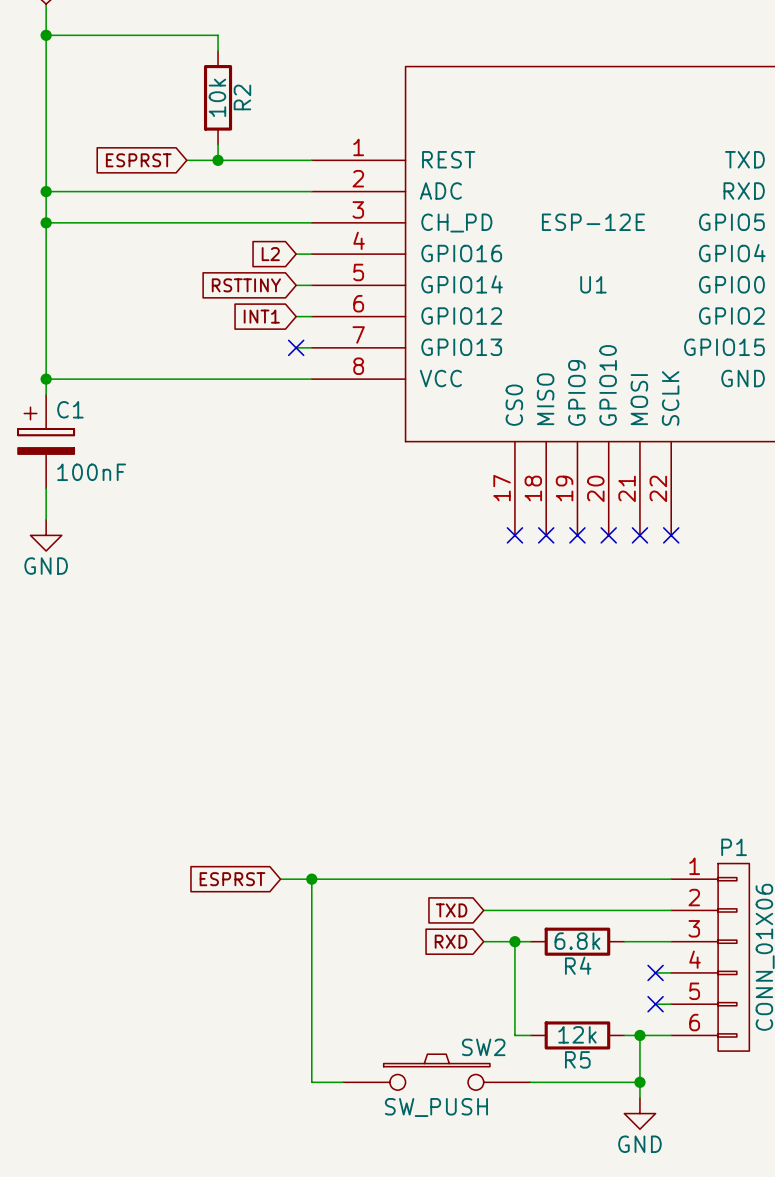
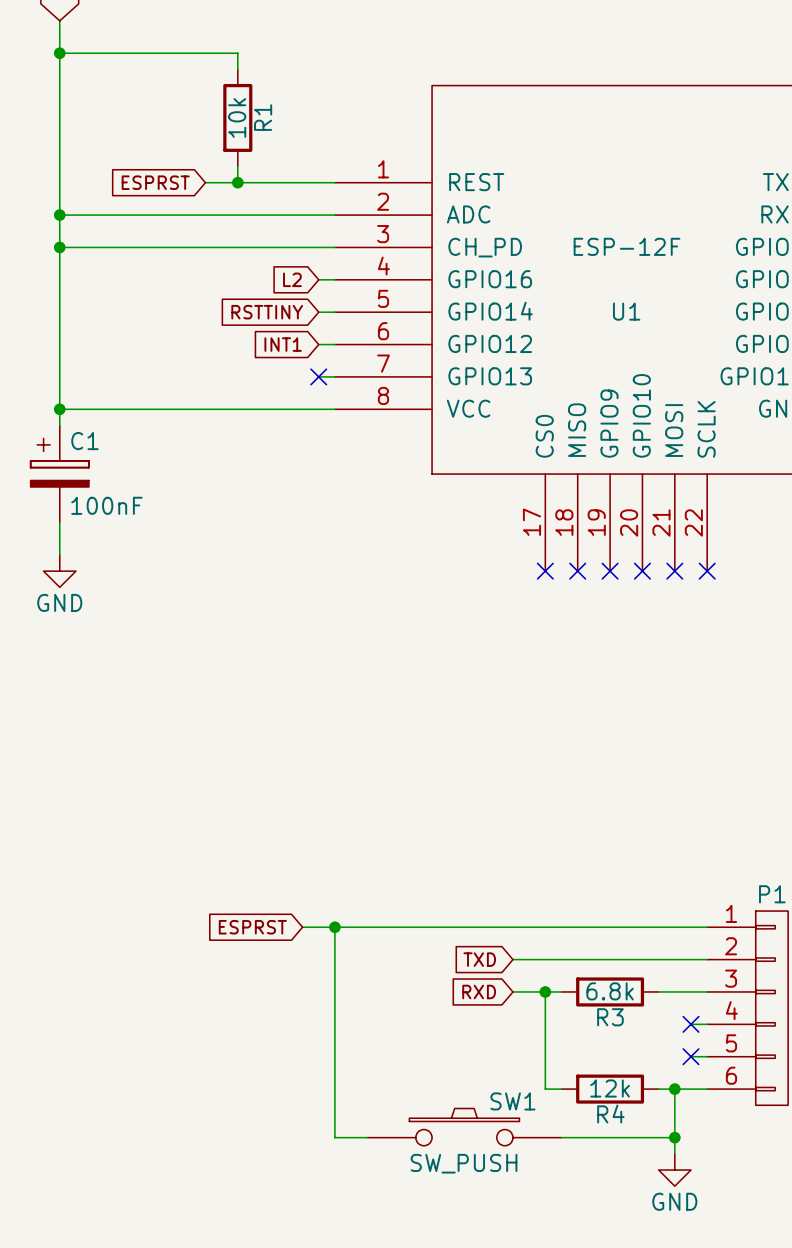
R2 name: R2 (242, 97) -> R1 (263, 117)
U1 value: ESP-12E (593, 222) -> ESP-12F (627, 246)
R4 name: R4 (578, 965) -> R3 (610, 1017)
SW2 name: SW2 (483, 1047) -> SW1 (512, 1101)
R5 name: R5 (577, 1059) -> R4 (610, 1114)

